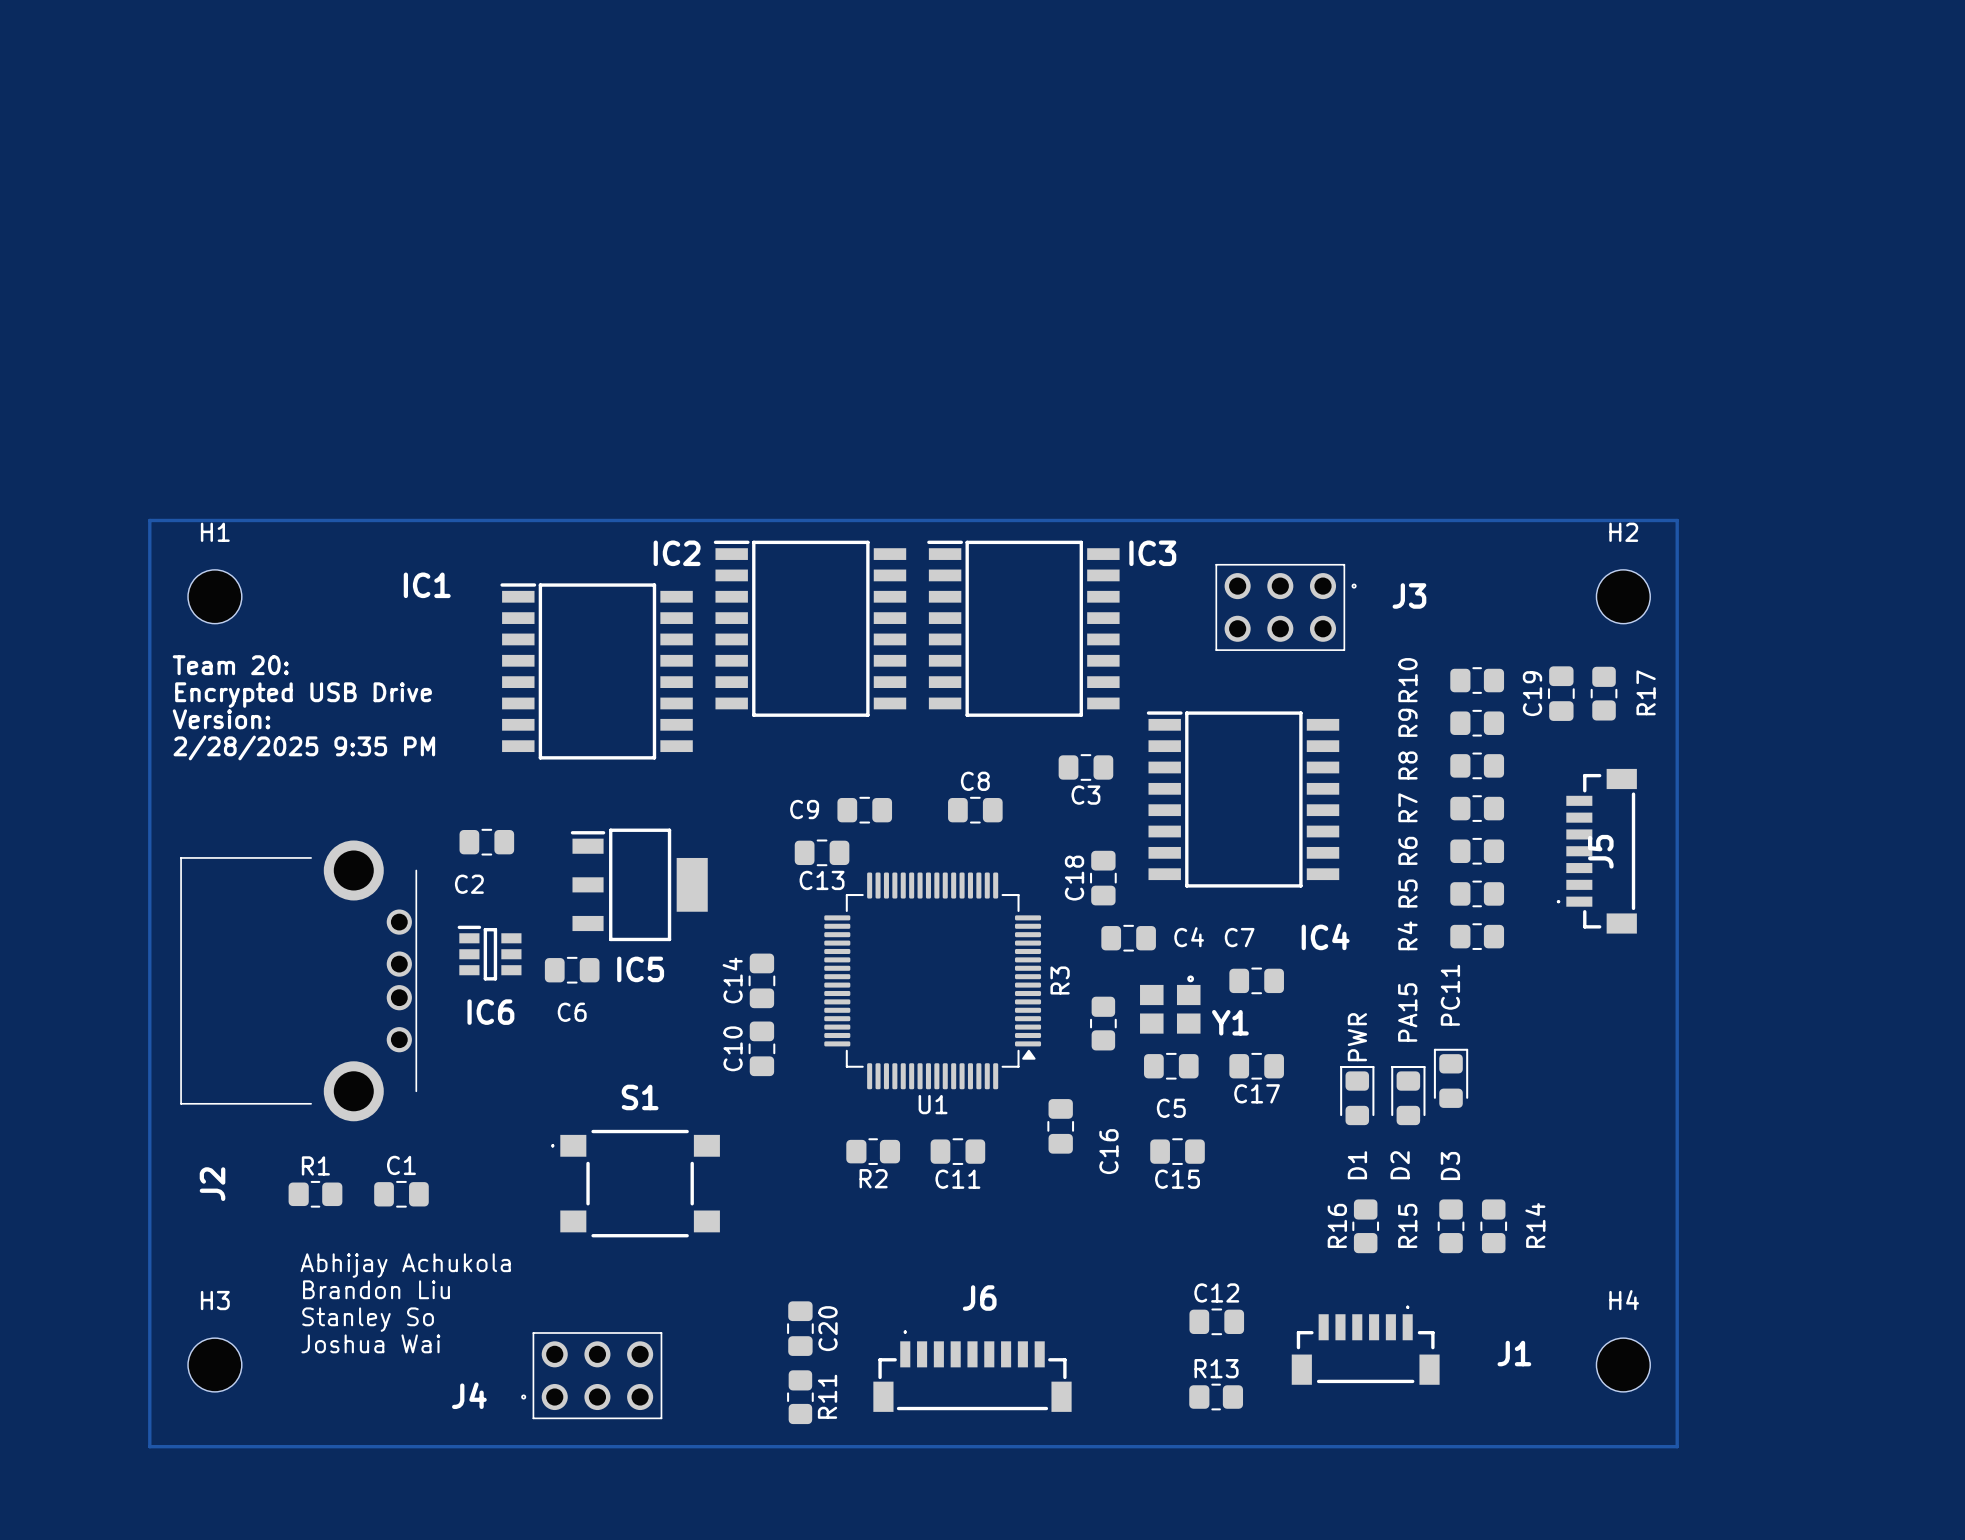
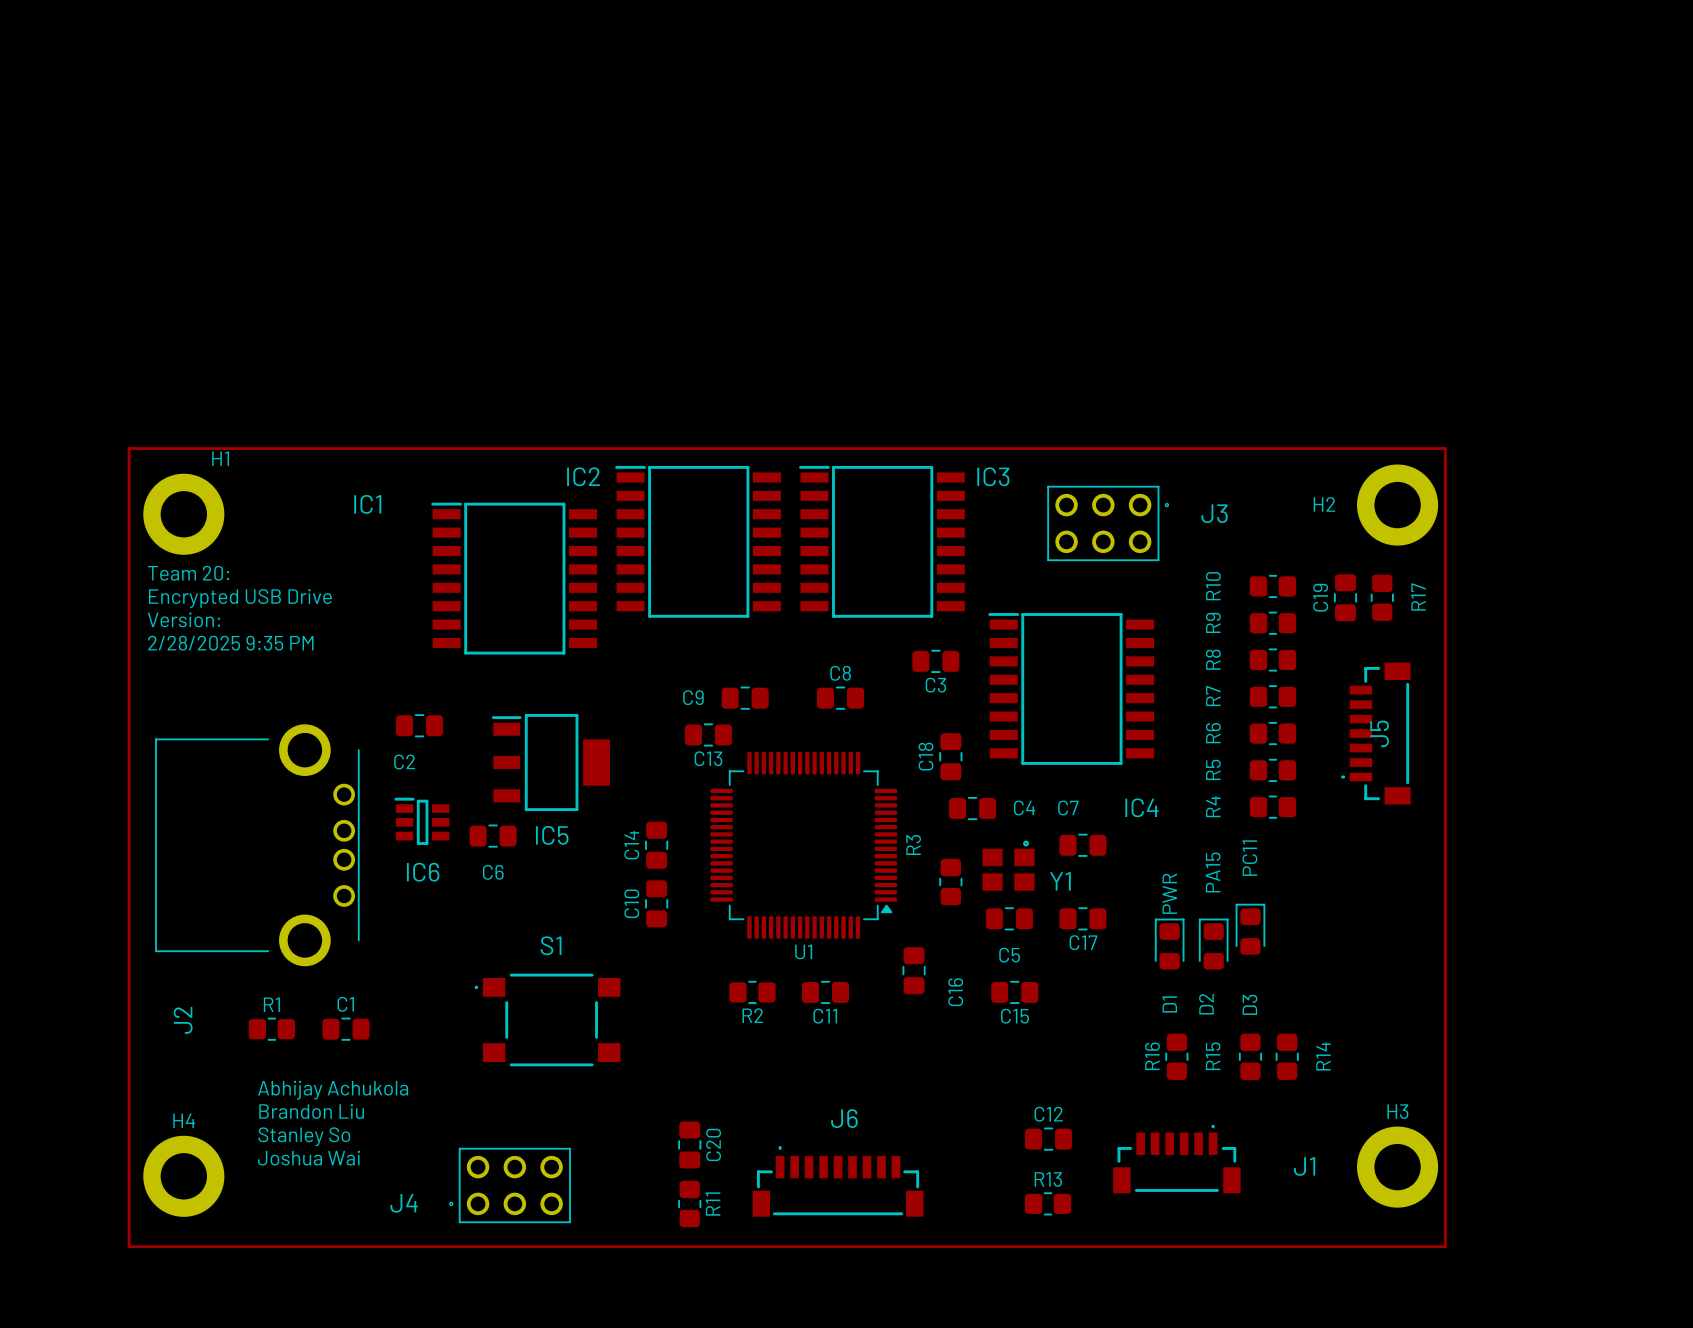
H1 name position: H1 (215, 532) -> H1 (220, 458)
H2 name position: H2 (1623, 532) -> H2 (1324, 504)
H1 footprint: [188, 569, 242, 624] -> [143, 473, 225, 555]
H2 footprint: [1596, 569, 1651, 624] -> [1357, 464, 1439, 546]
H3 footprint: [188, 1338, 242, 1392] -> [1357, 1126, 1439, 1208]
H4 footprint: [1596, 1338, 1651, 1392] -> [143, 1135, 225, 1217]

